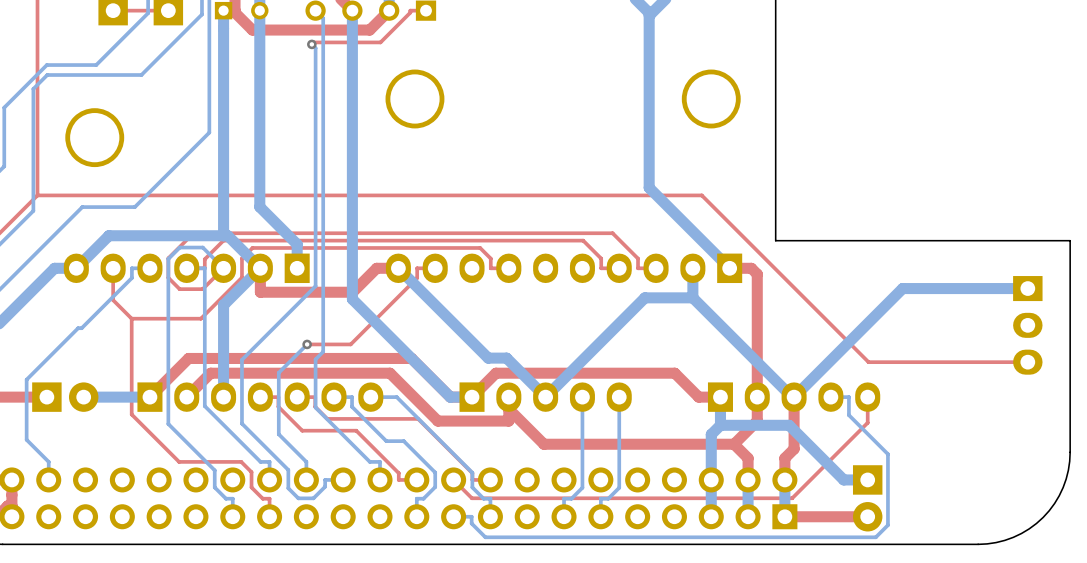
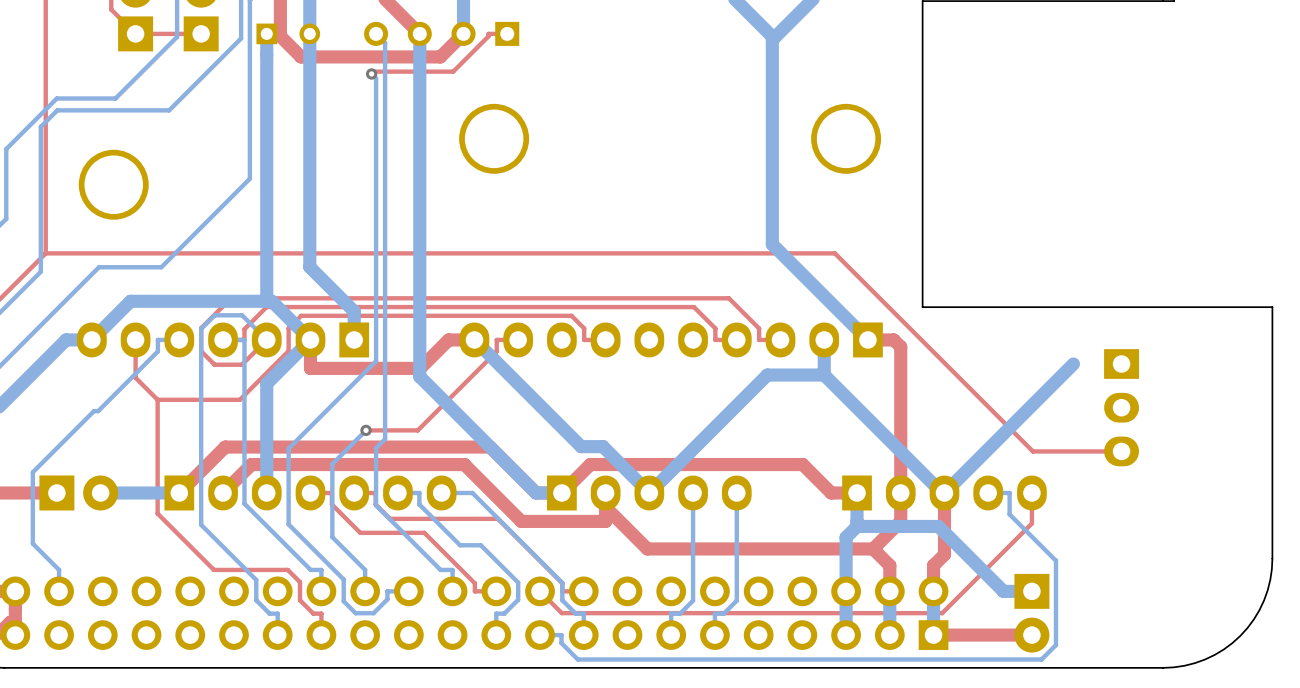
bottom track: (1027, 288) (902, 288) -> none
part position: (1027, 325) -> (1121, 407)
top track: (1027, 362) (943, 362) -> none

